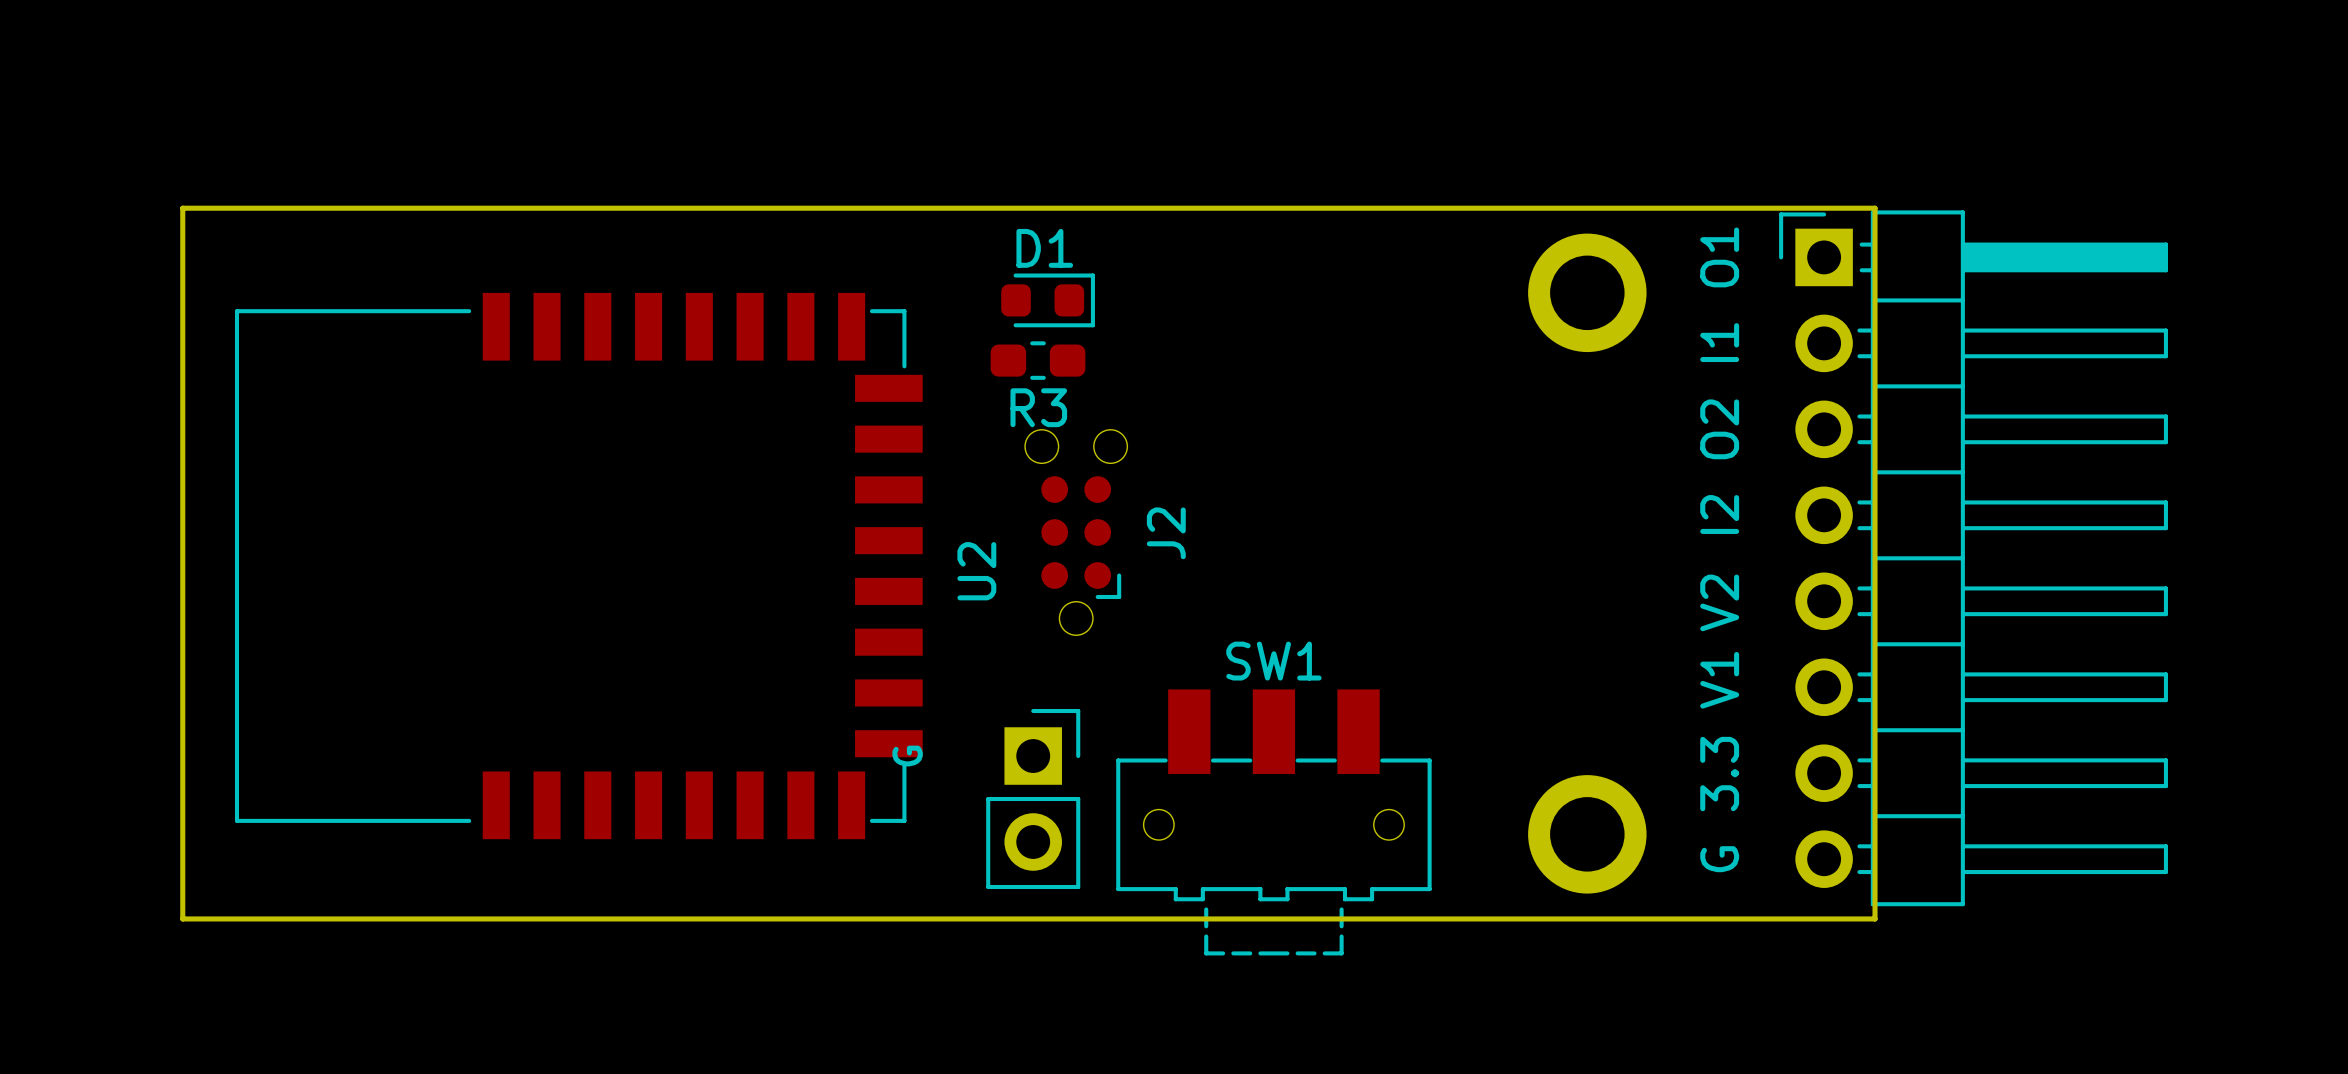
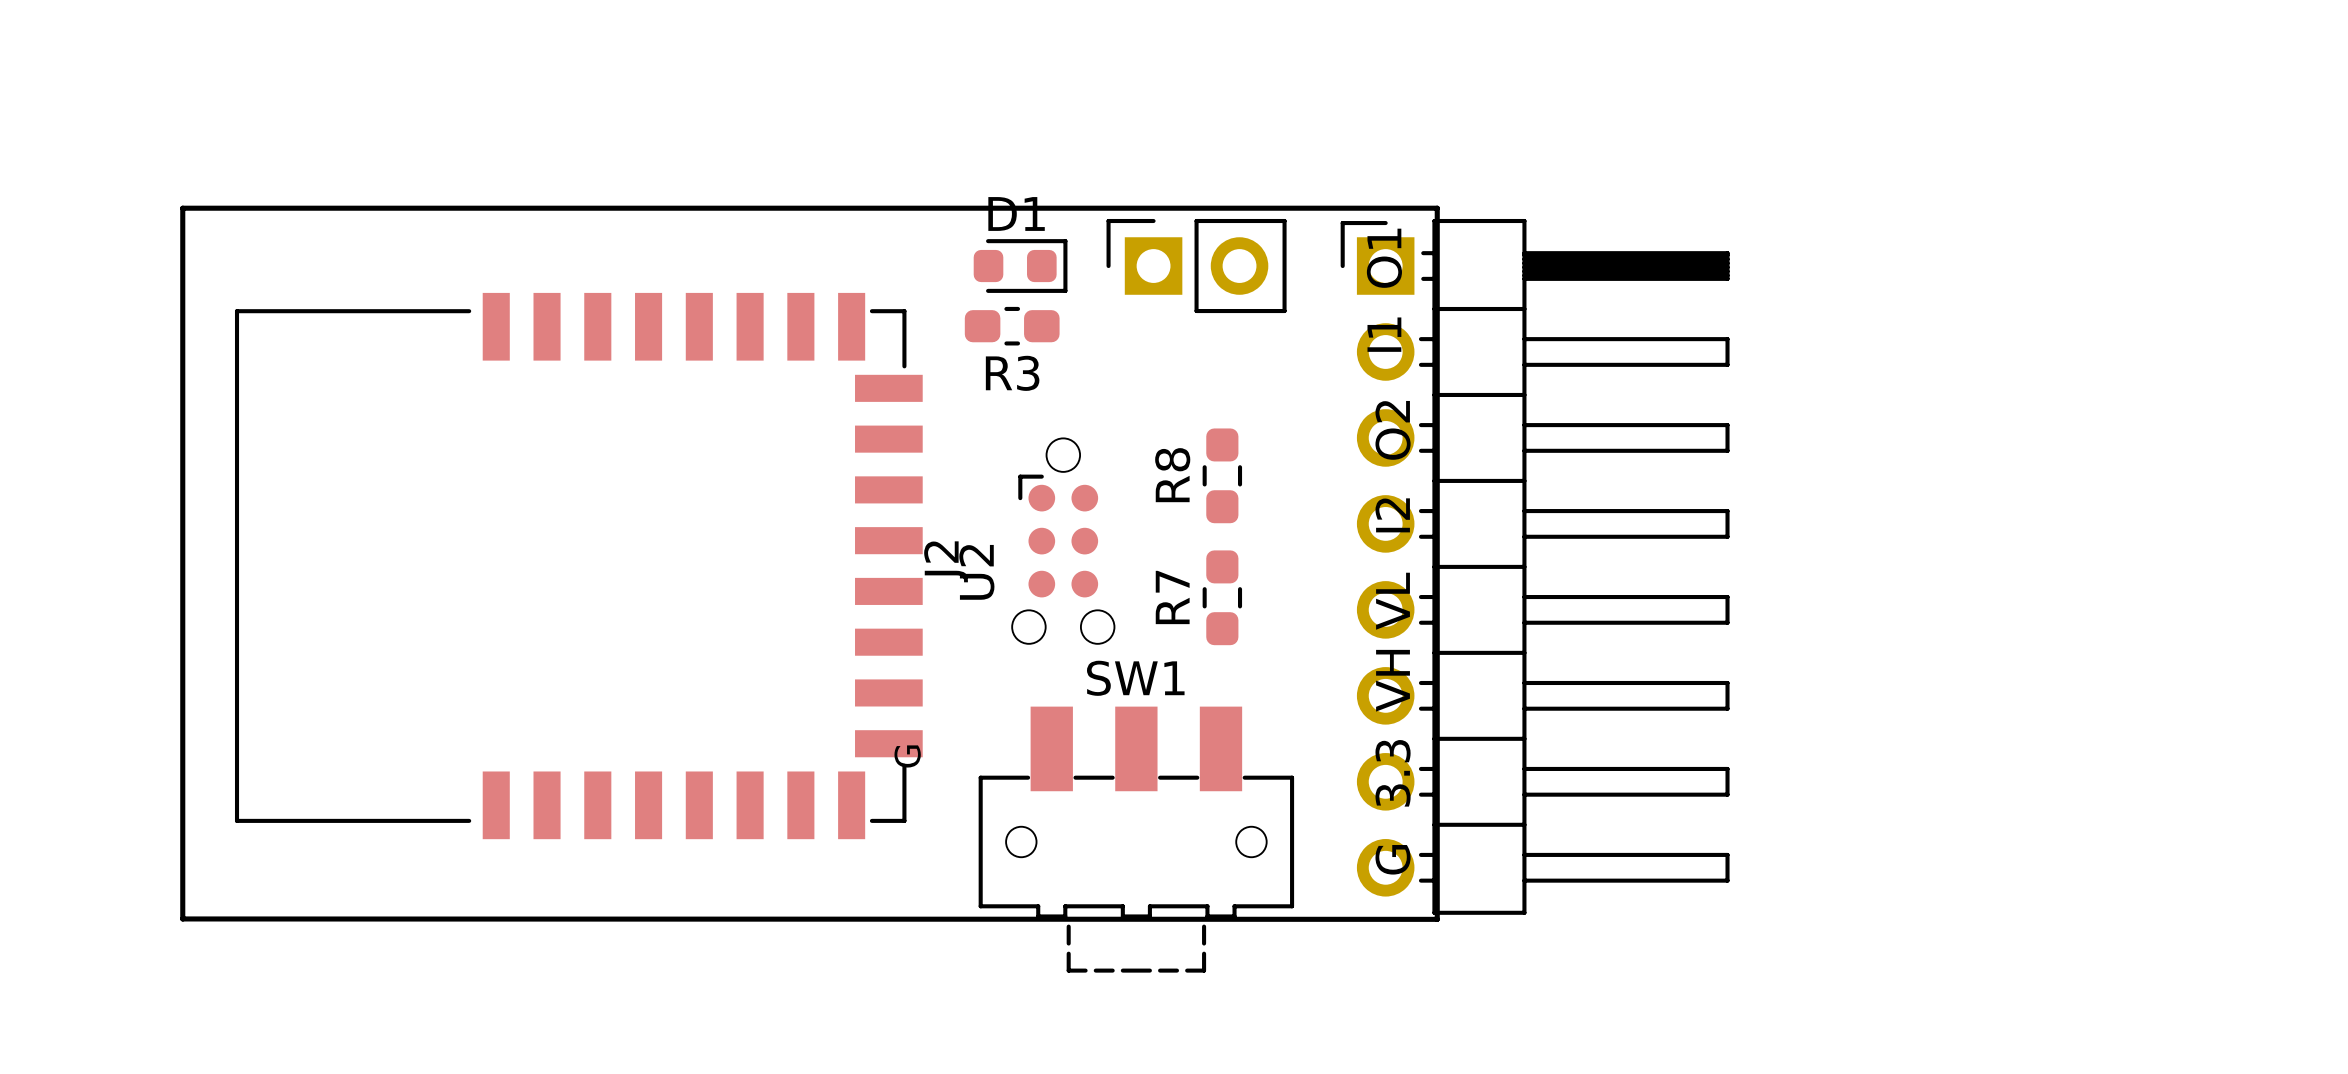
board edge: (1437, 208) (1875, 208) (1875, 918) (182, 918) -> (1437, 208) (1437, 919) (182, 918)
text position: O1 (1719, 257) -> O1 (1384, 258)
part: (1587, 292) -> none
D1 position: (1048, 300) -> (1020, 266)
text position: I1 (1719, 342) -> I1 (1384, 334)
R3 position: (1037, 360) -> (1012, 326)
text position: O2 (1719, 429) -> O2 (1393, 430)
R8: none -> (1222, 475)
text position: I2 (1719, 514) -> I2 (1392, 515)
J2 rotation: 0° (1076, 532) -> 180° (1063, 541)
part position: (1973, 558) -> (1535, 566)
R7: none -> (1222, 597)
text: none -> VL (1393, 601)
text: V2 (1719, 602) -> none
text: V1 (1719, 680) -> none
text: none -> VH (1393, 680)
text position: 3.3 (1719, 774) -> 3.3 (1393, 773)
part rotation: 0° (1033, 799) -> 90° counterclockwise (1196, 266)
part position: (1033, 799) -> (1196, 266)
SW1 position: (1273, 822) -> (1136, 839)
part: (1587, 834) -> none
text position: G (1719, 859) -> G (1393, 859)

